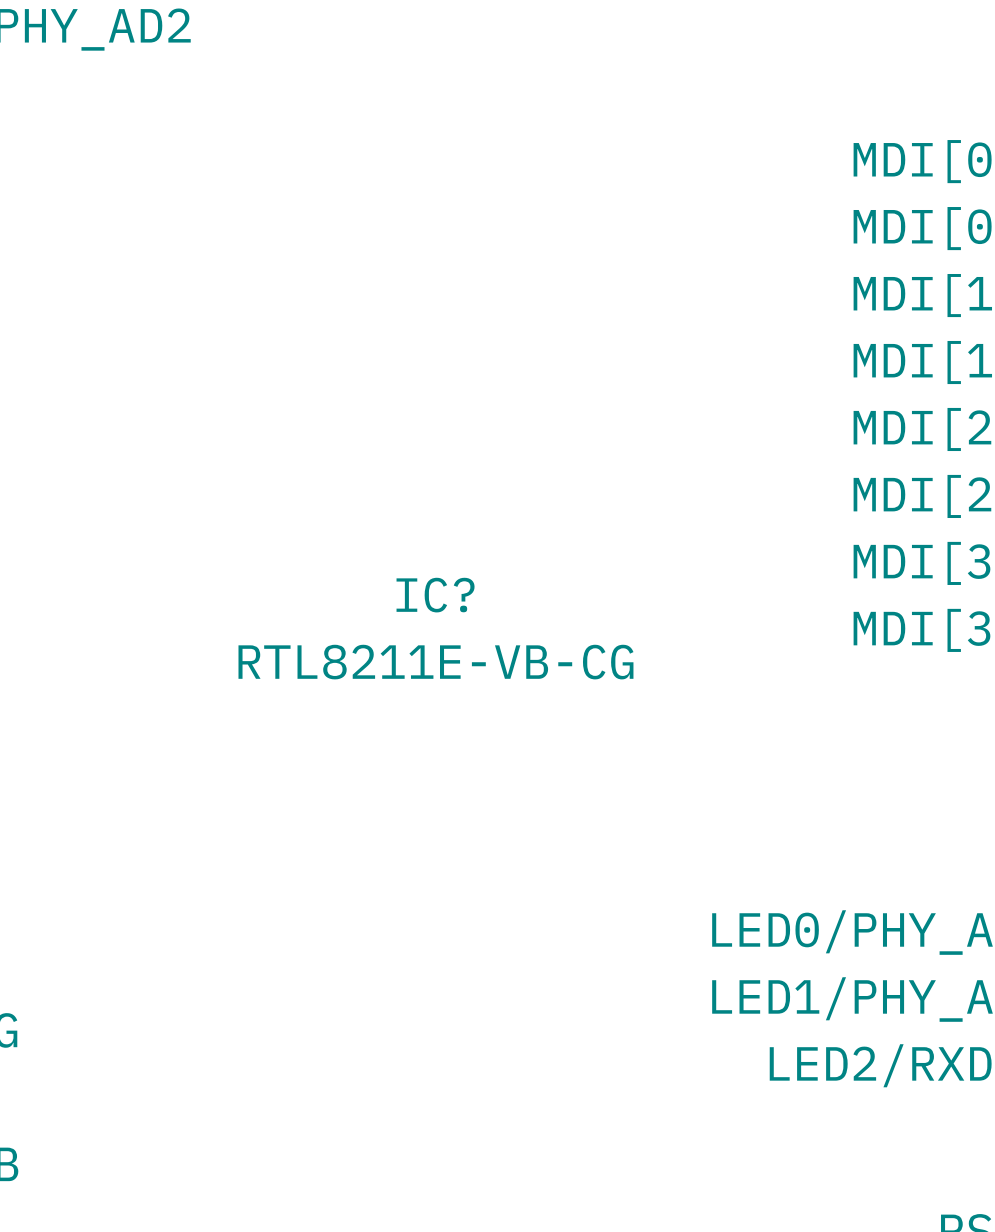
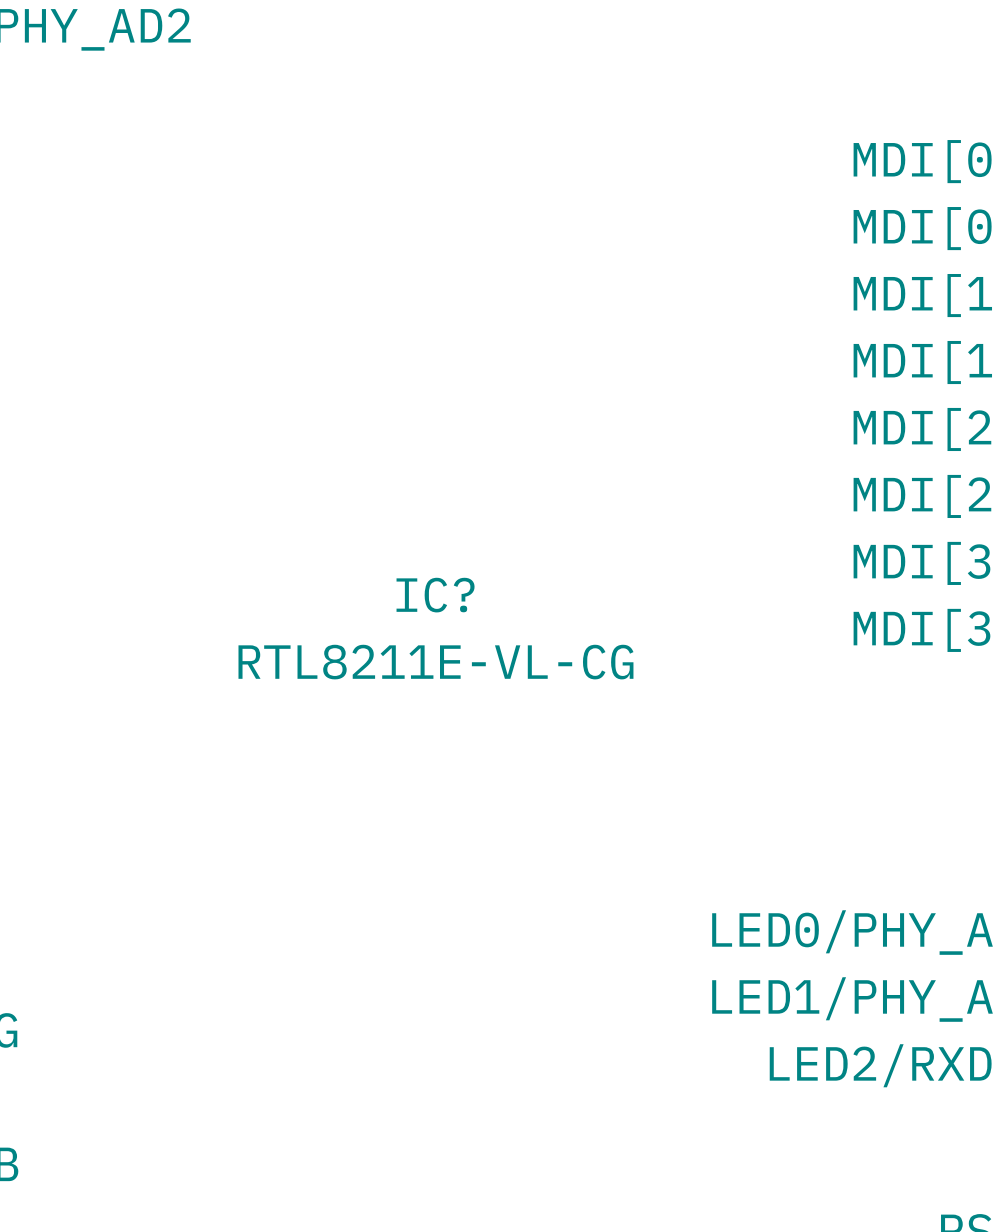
IC? value: RTL8211E-VB-CG (435, 662) -> RTL8211E-VL-CG (435, 662)

